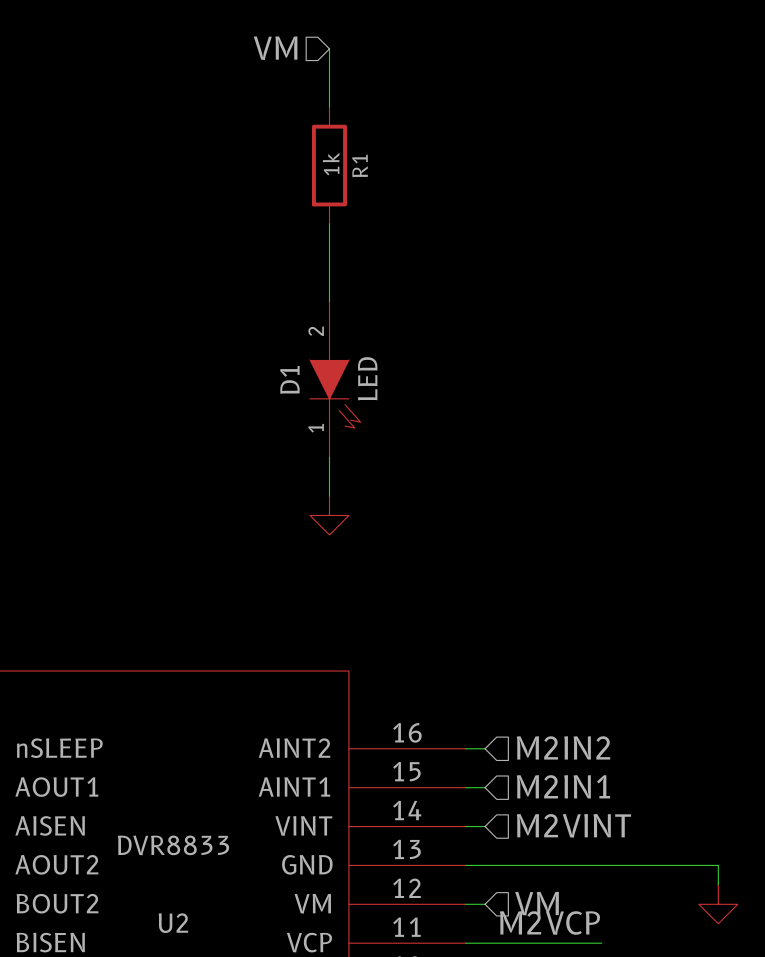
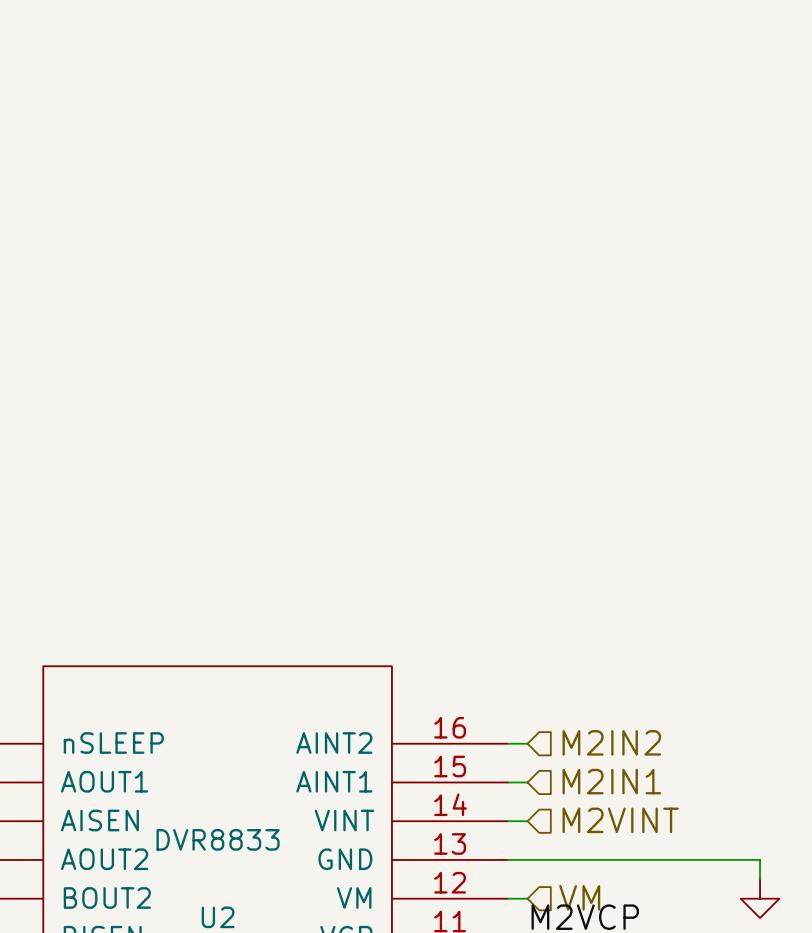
hierarchical label: VM (275, 48) -> none
wire: (329, 48) (329, 107) -> none
R1: 1k (329, 165) -> none
wire: (329, 223) (329, 301) -> none
D1: LED (335, 379) -> none
wire: (329, 457) (329, 496) -> none
power symbol: (329, 515) -> none

